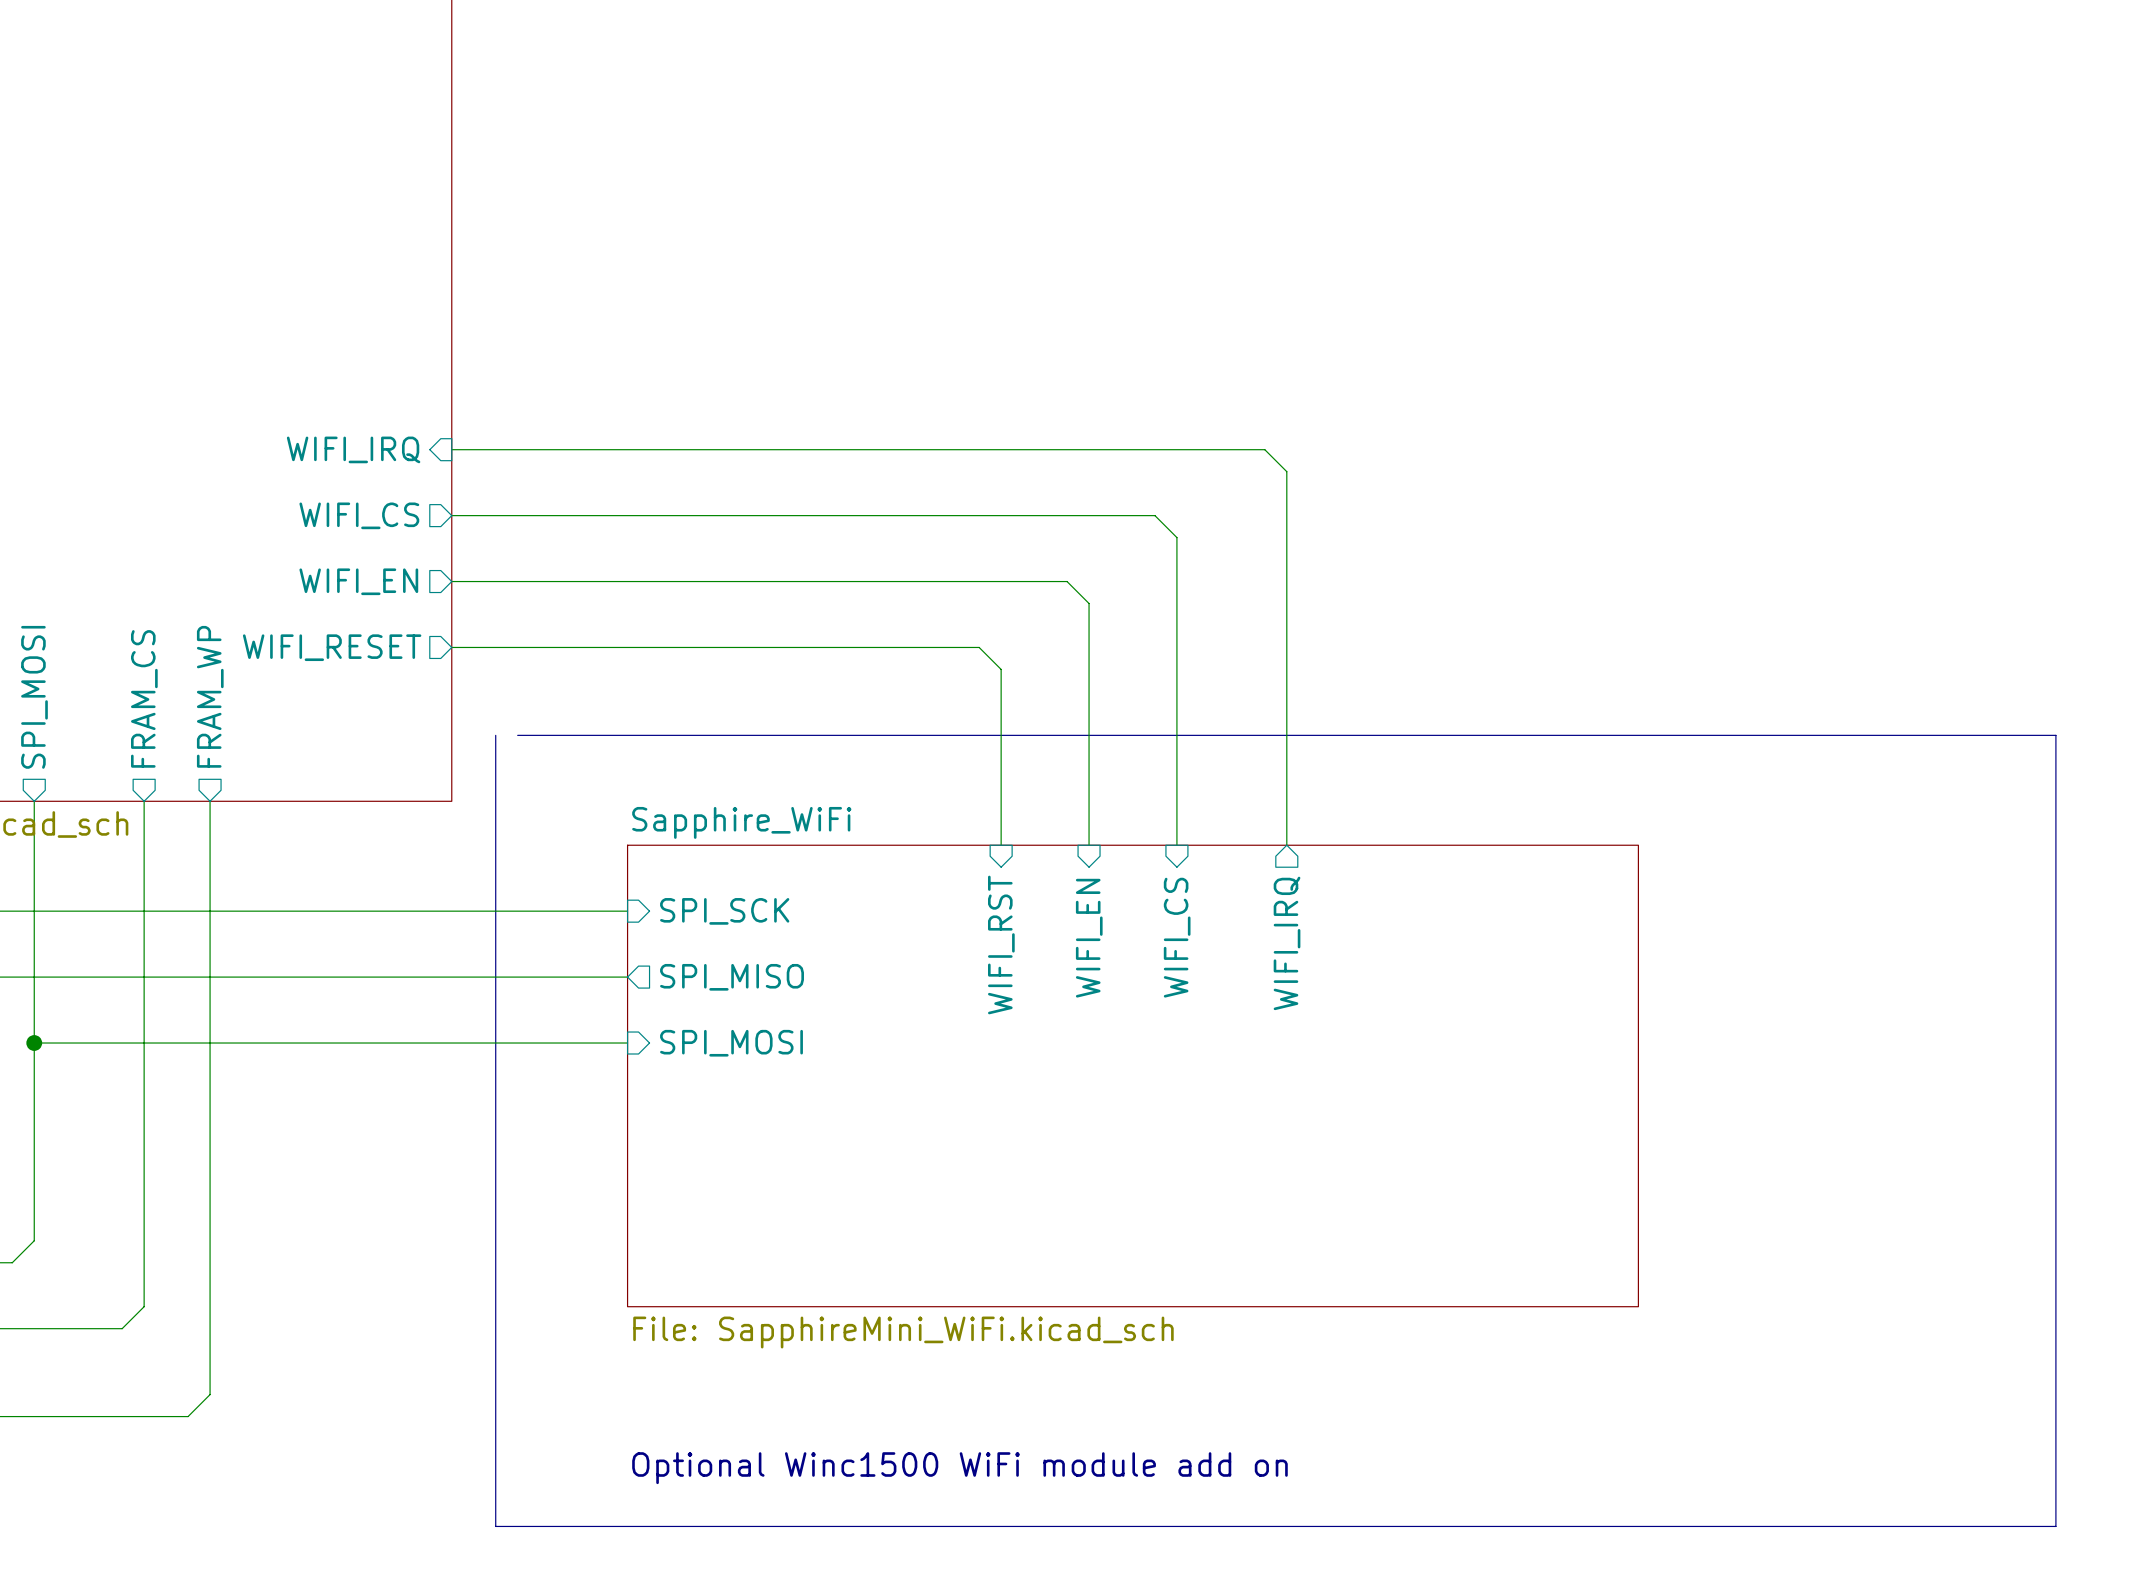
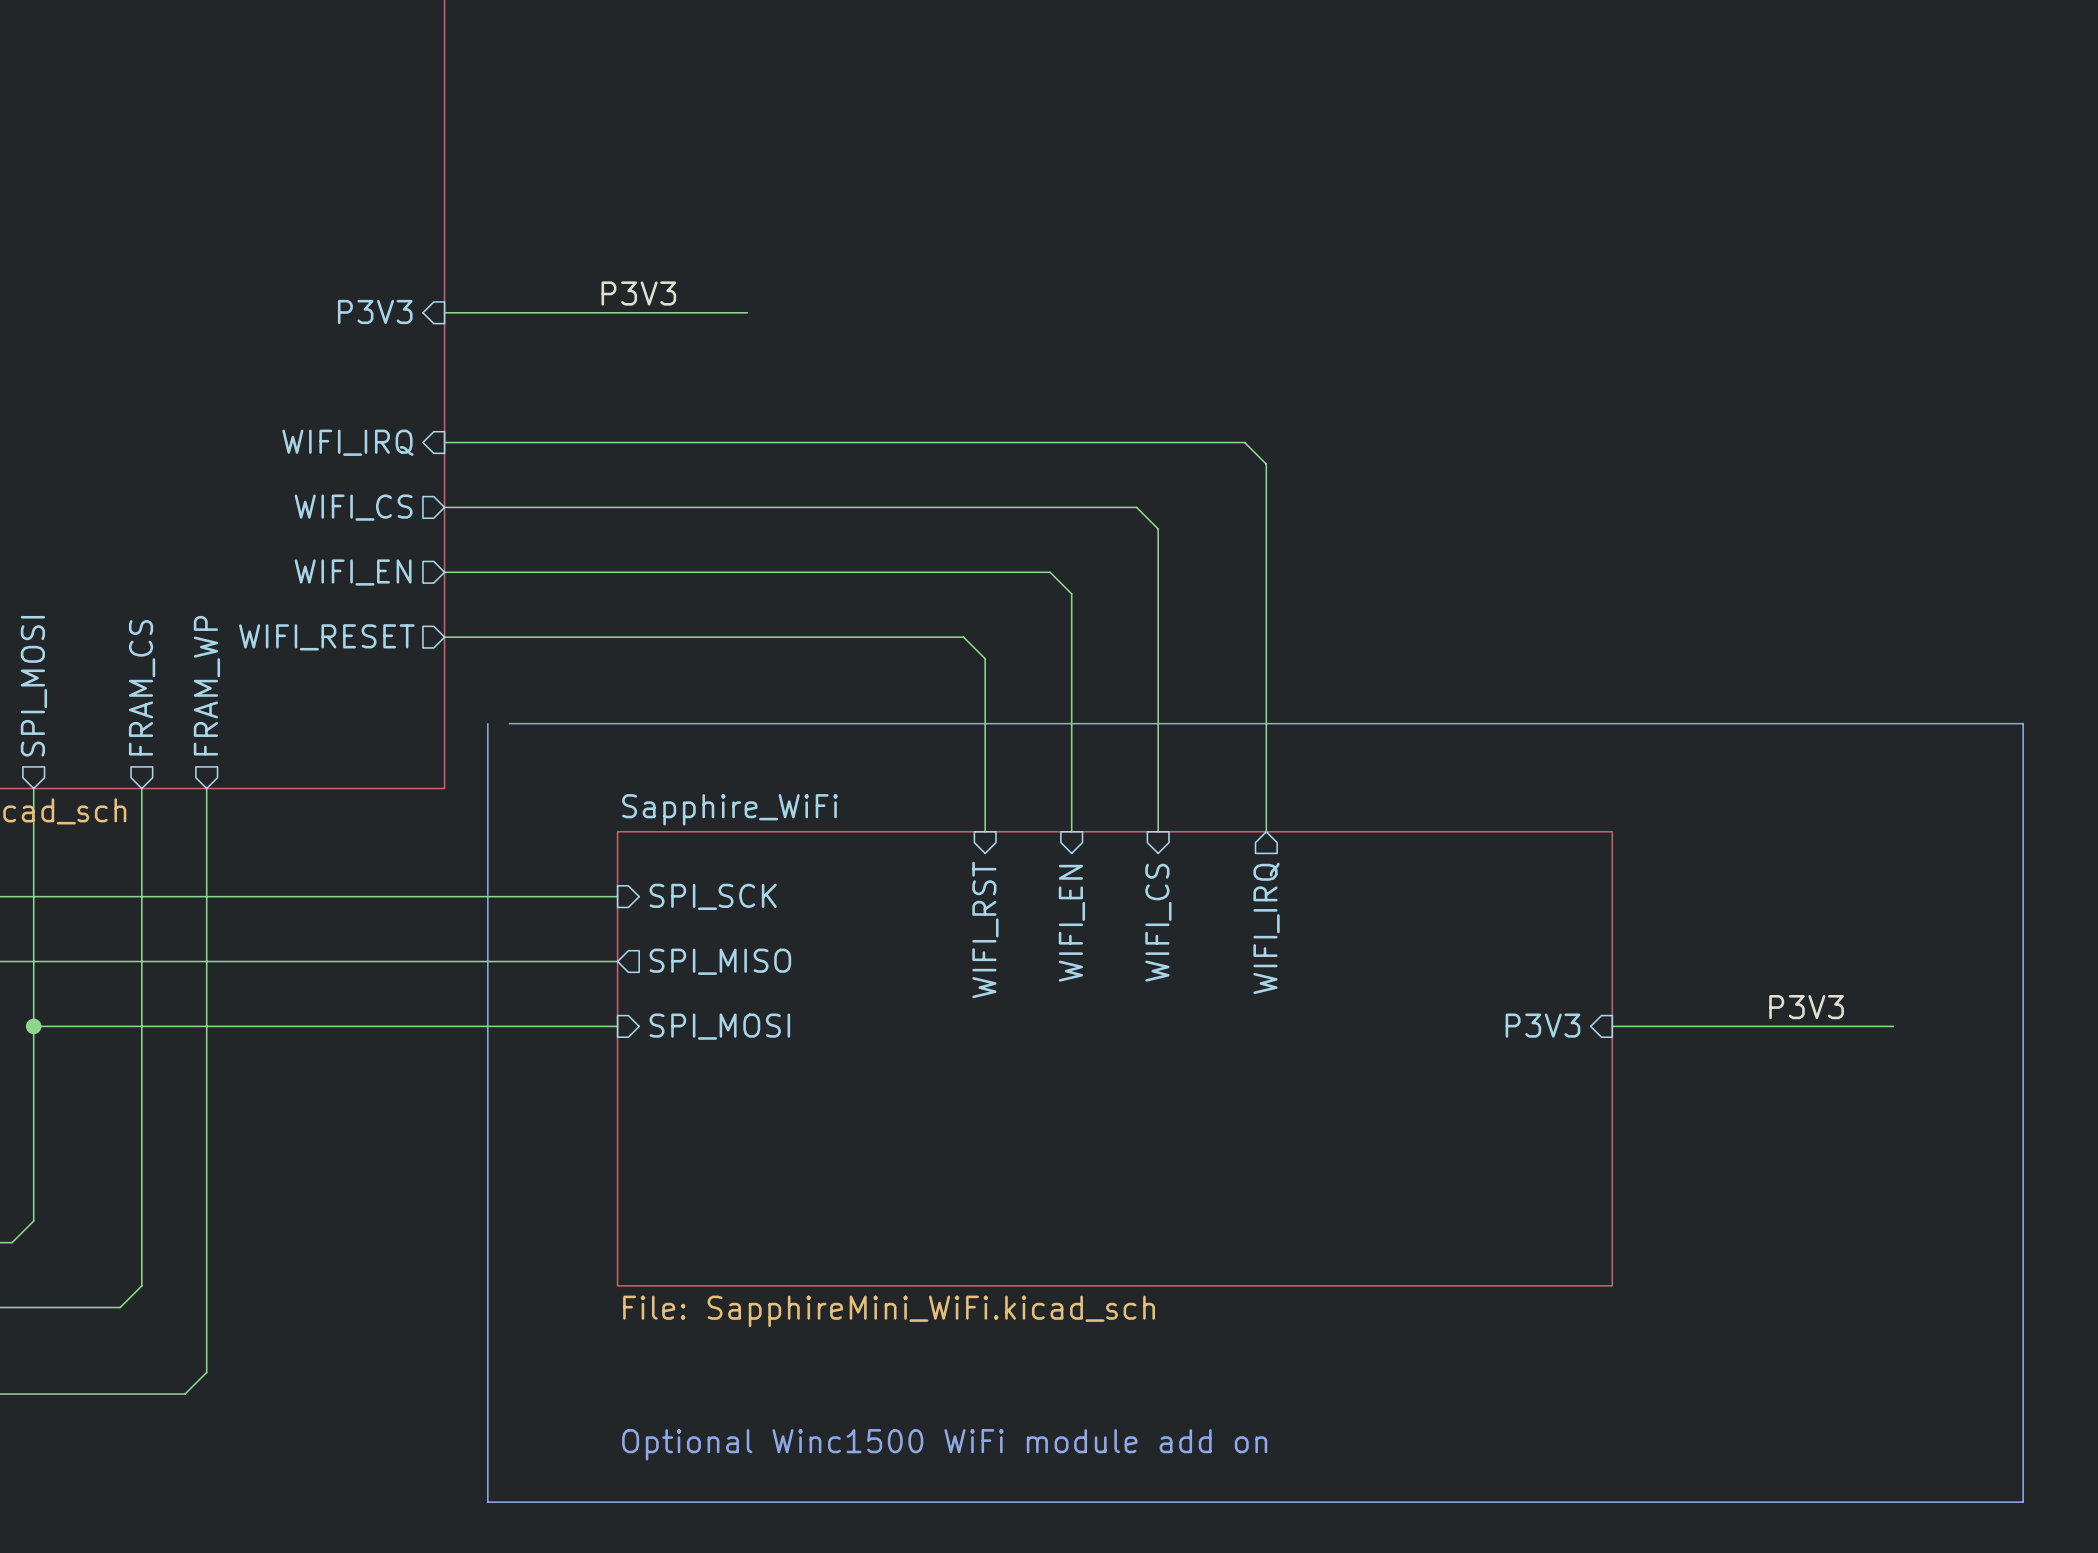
label: none -> P3V3 (638, 293)
sheet pin: none -> P3V3 (375, 311)
wire: none -> (444, 312) (747, 312)
label: none -> P3V3 (1806, 1007)
sheet pin: none -> P3V3 (1542, 1025)
wire: none -> (1612, 1026) (1893, 1026)

